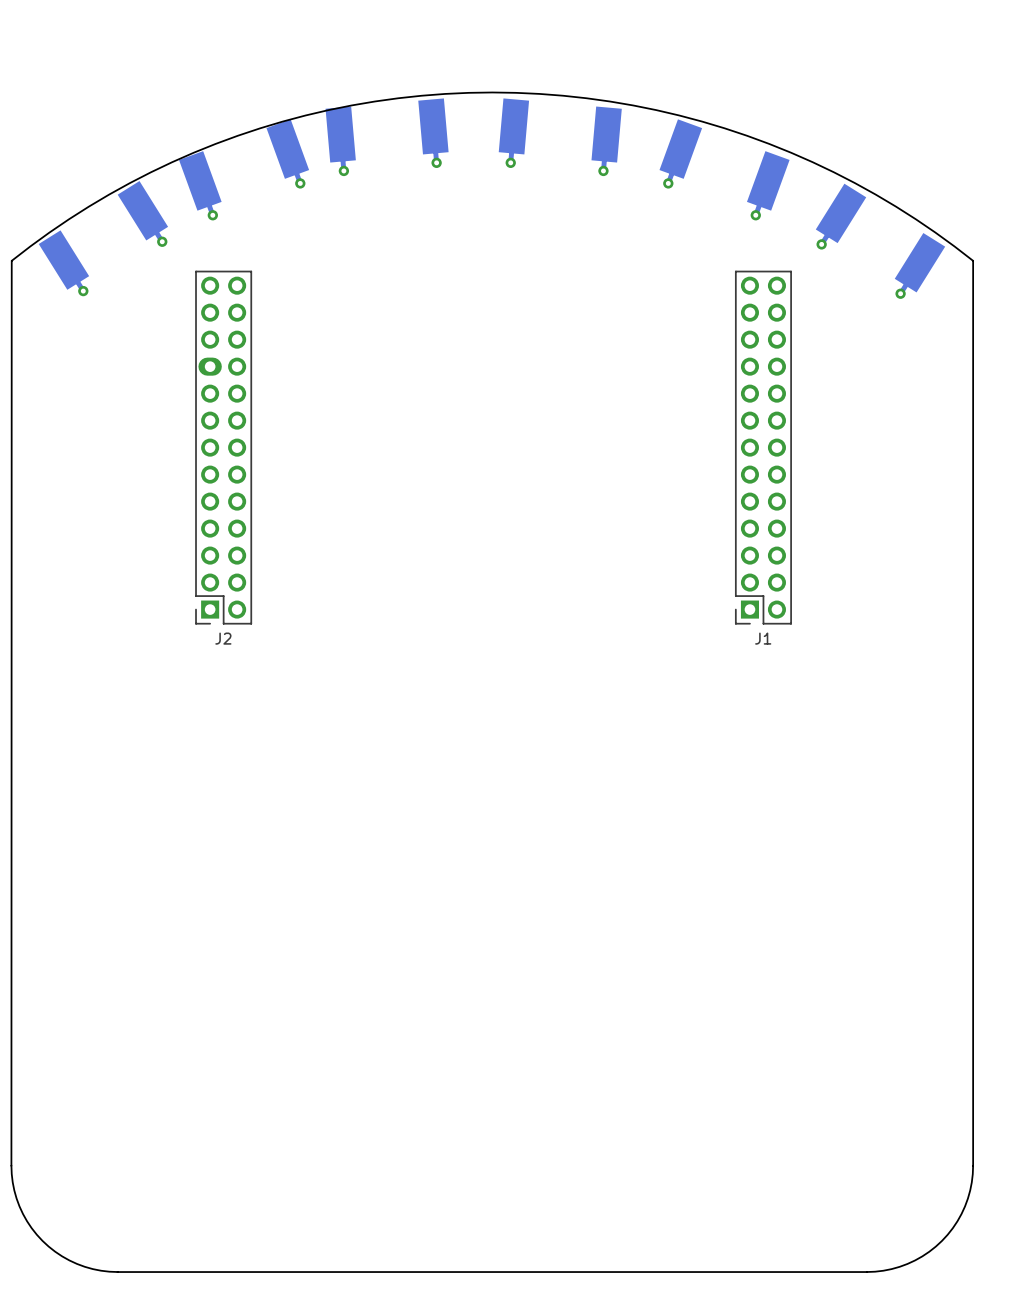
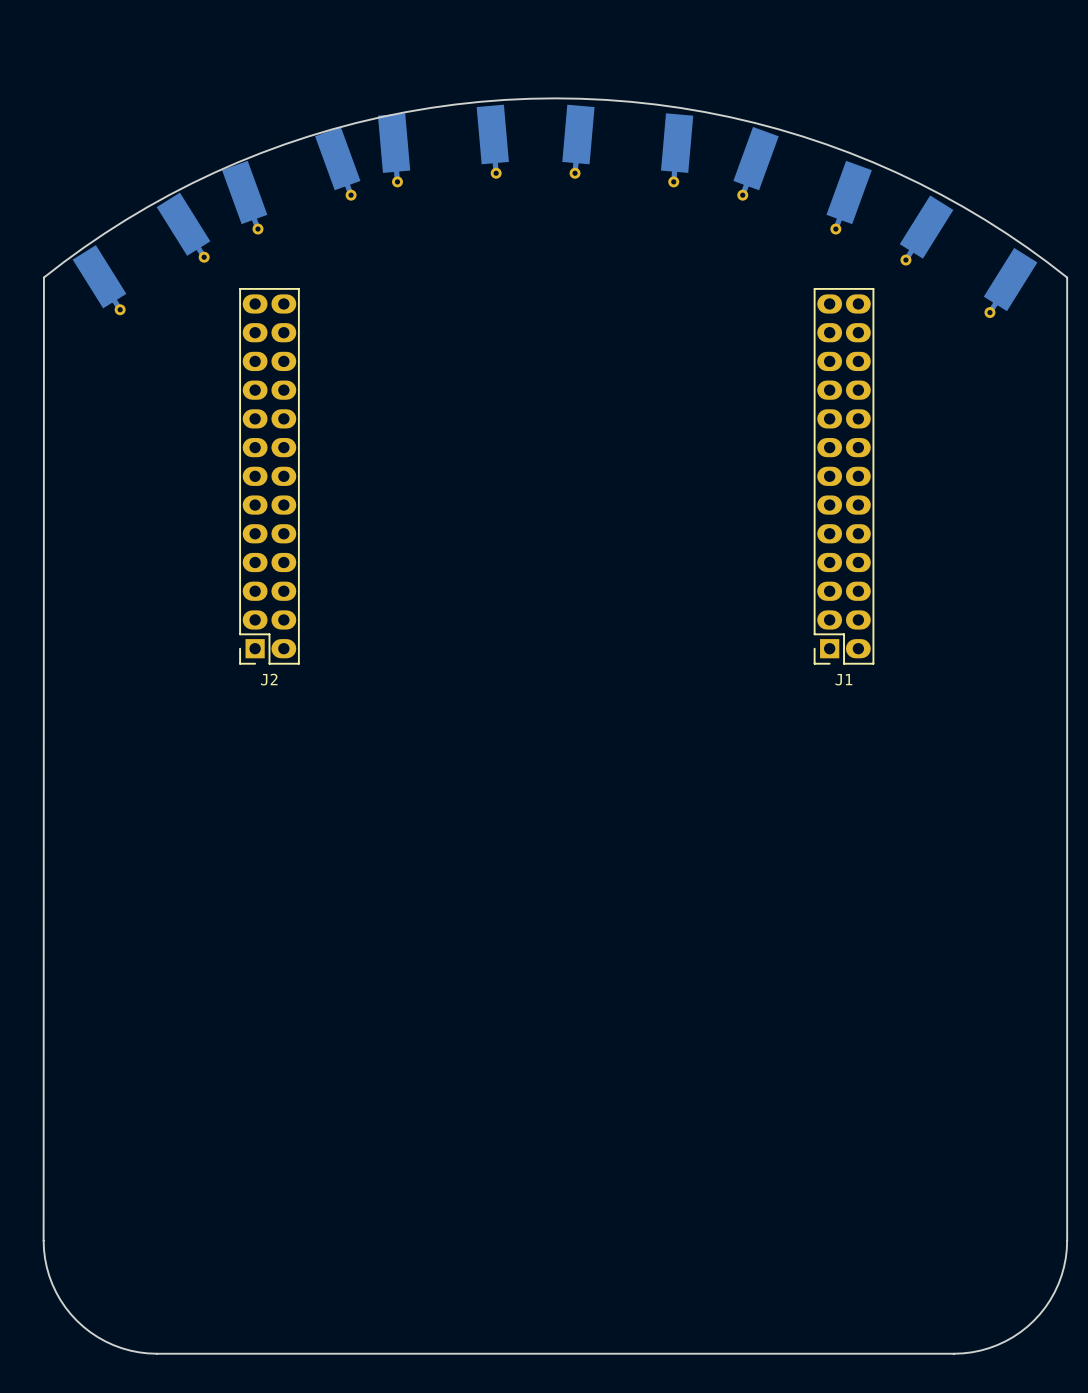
J2 footprint: [195, 270, 252, 625] -> [239, 288, 300, 665]
J1 footprint: [735, 270, 792, 625] -> [813, 288, 875, 665]

